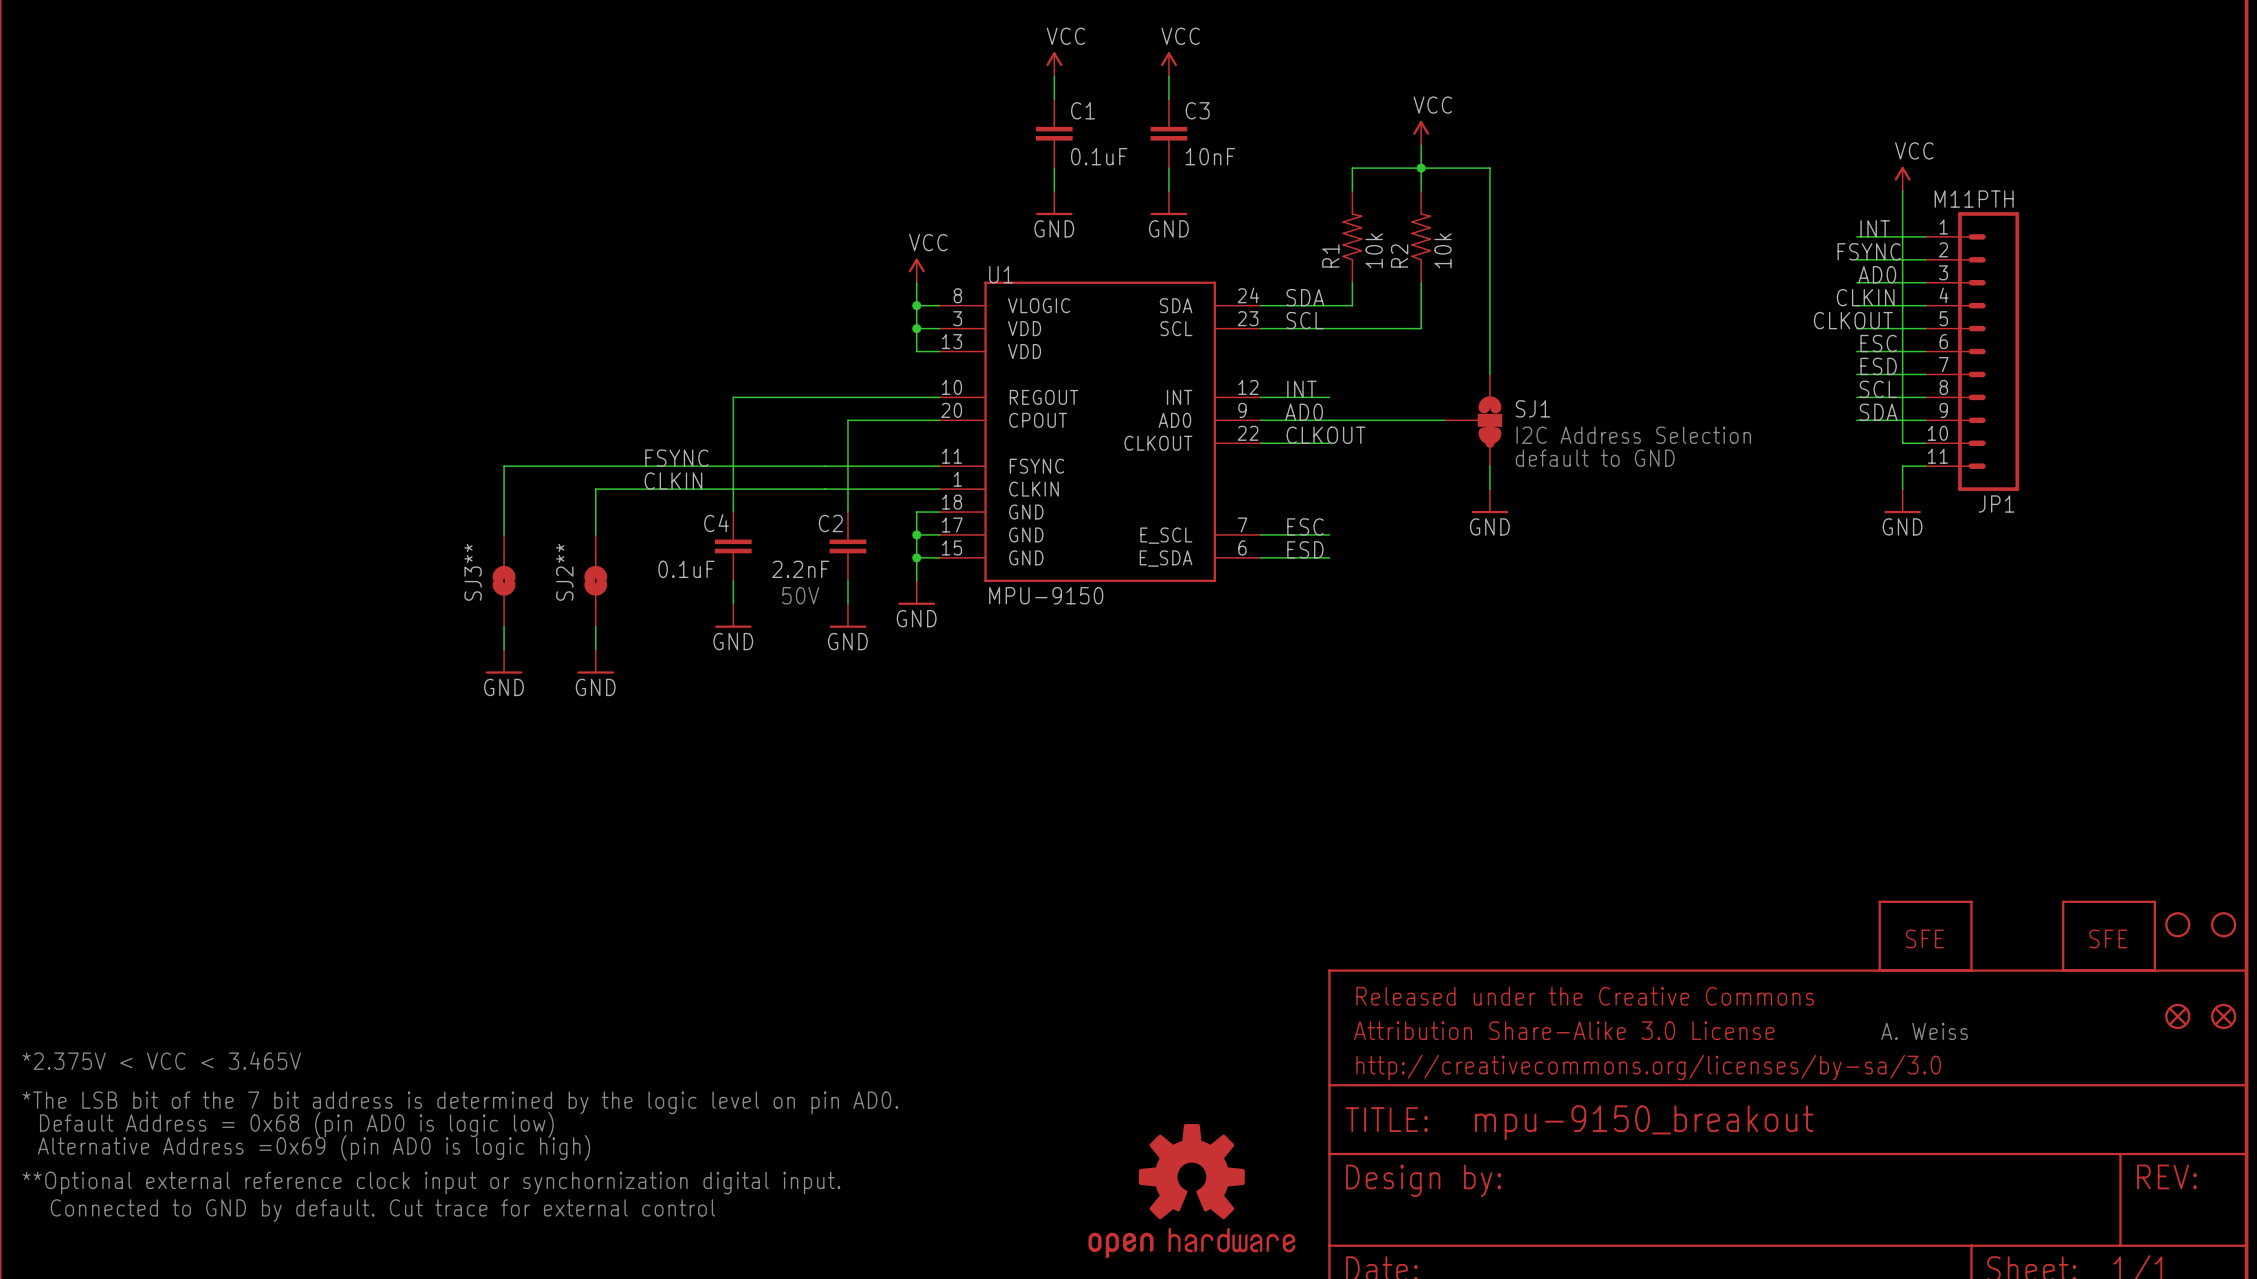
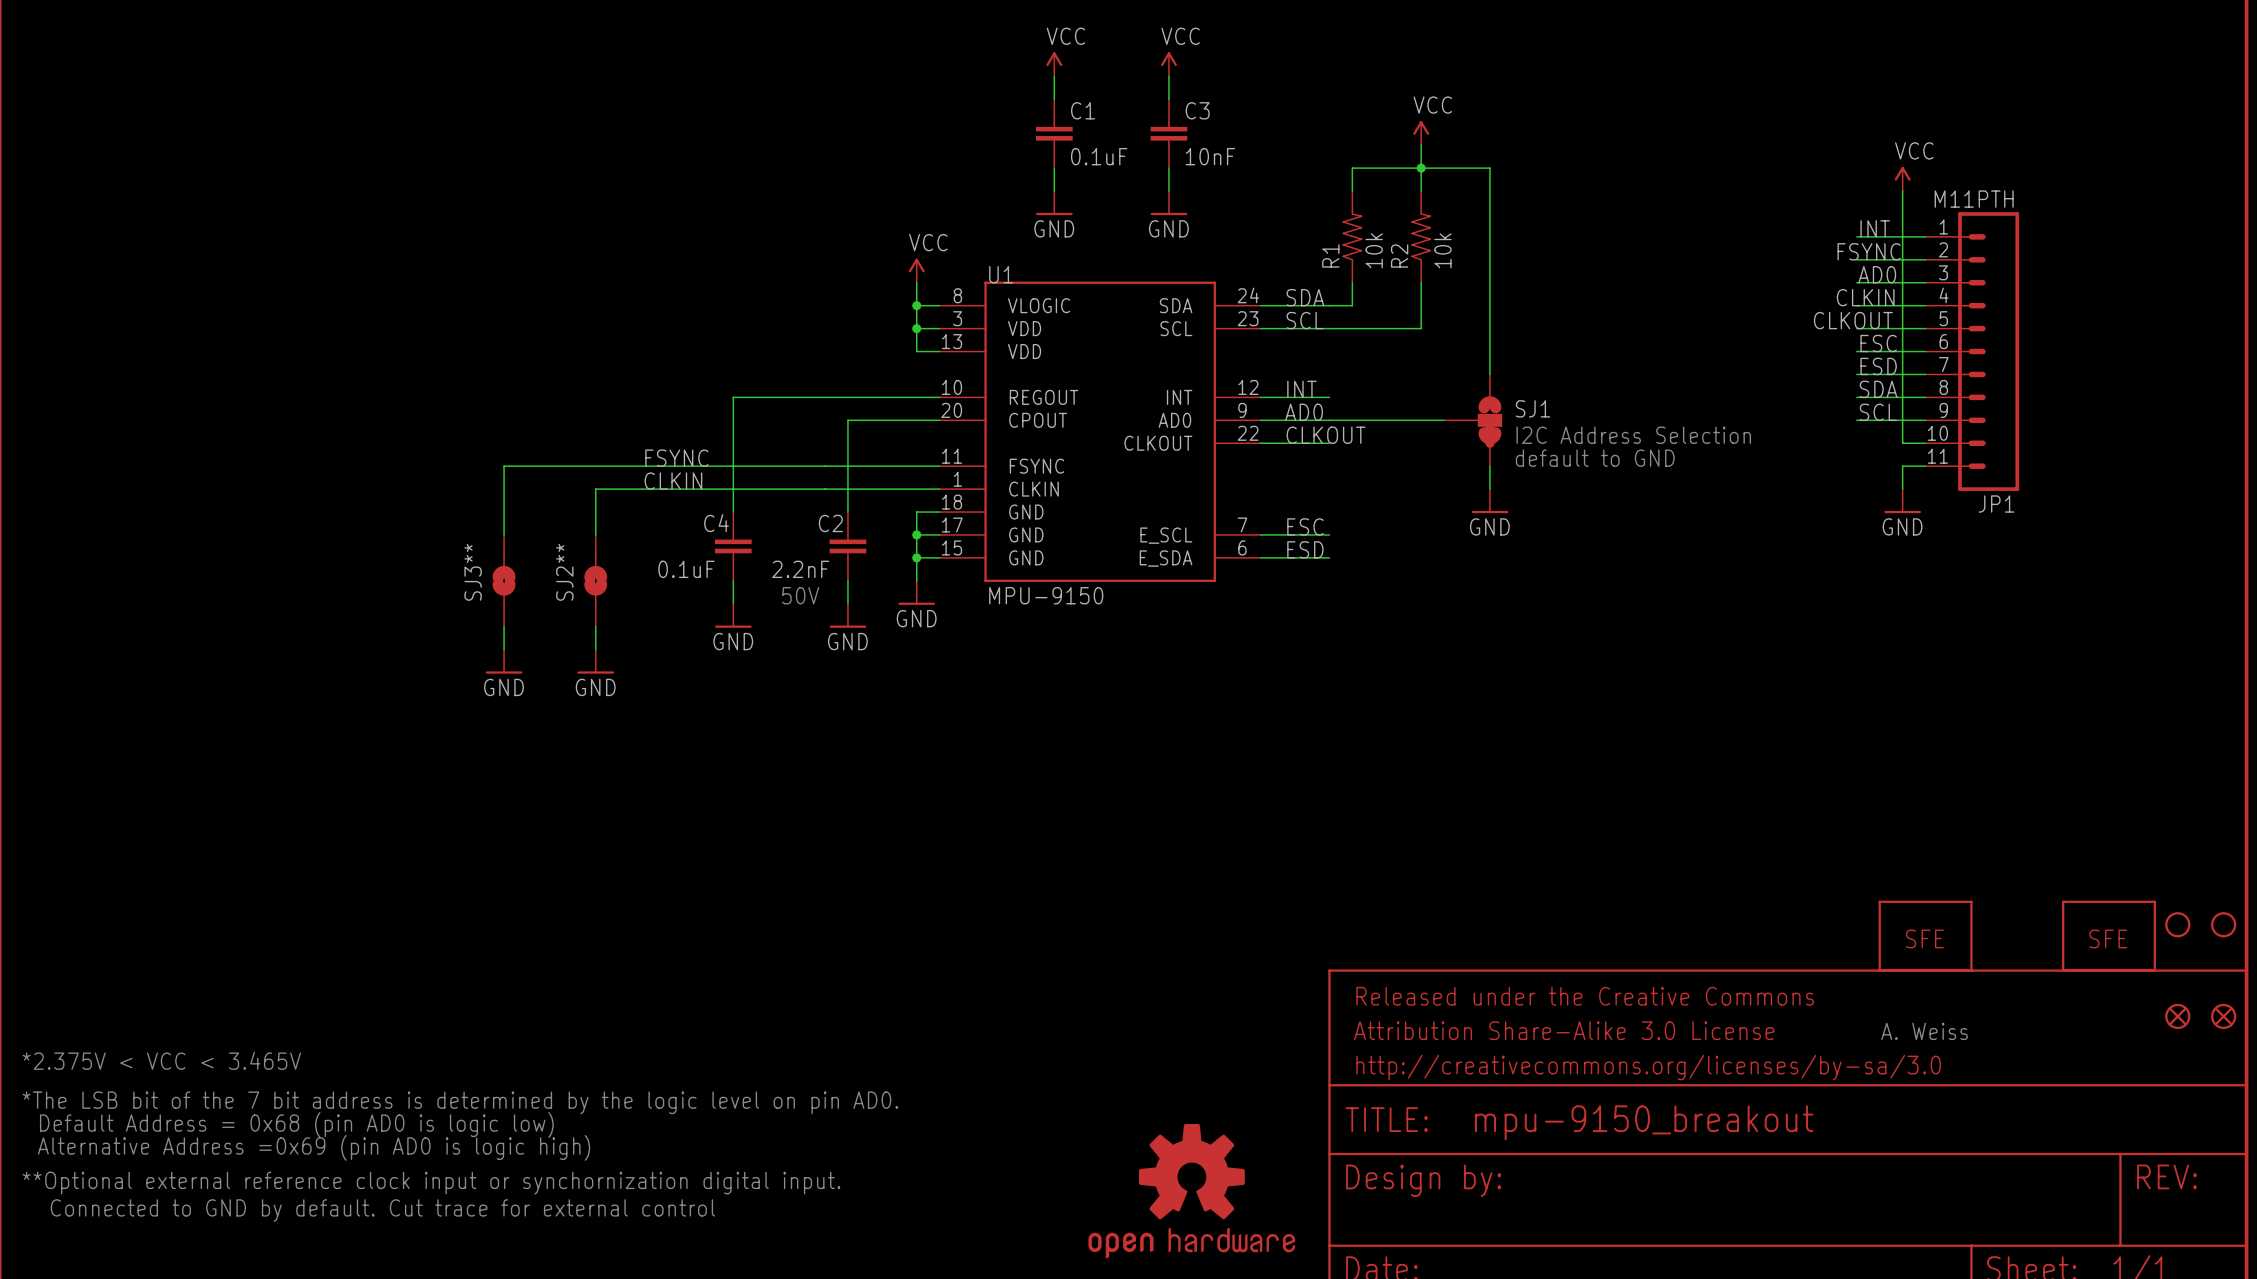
label: SCL (1878, 389) -> SDA (1878, 389)
label: SDA (1878, 412) -> SCL (1878, 412)

